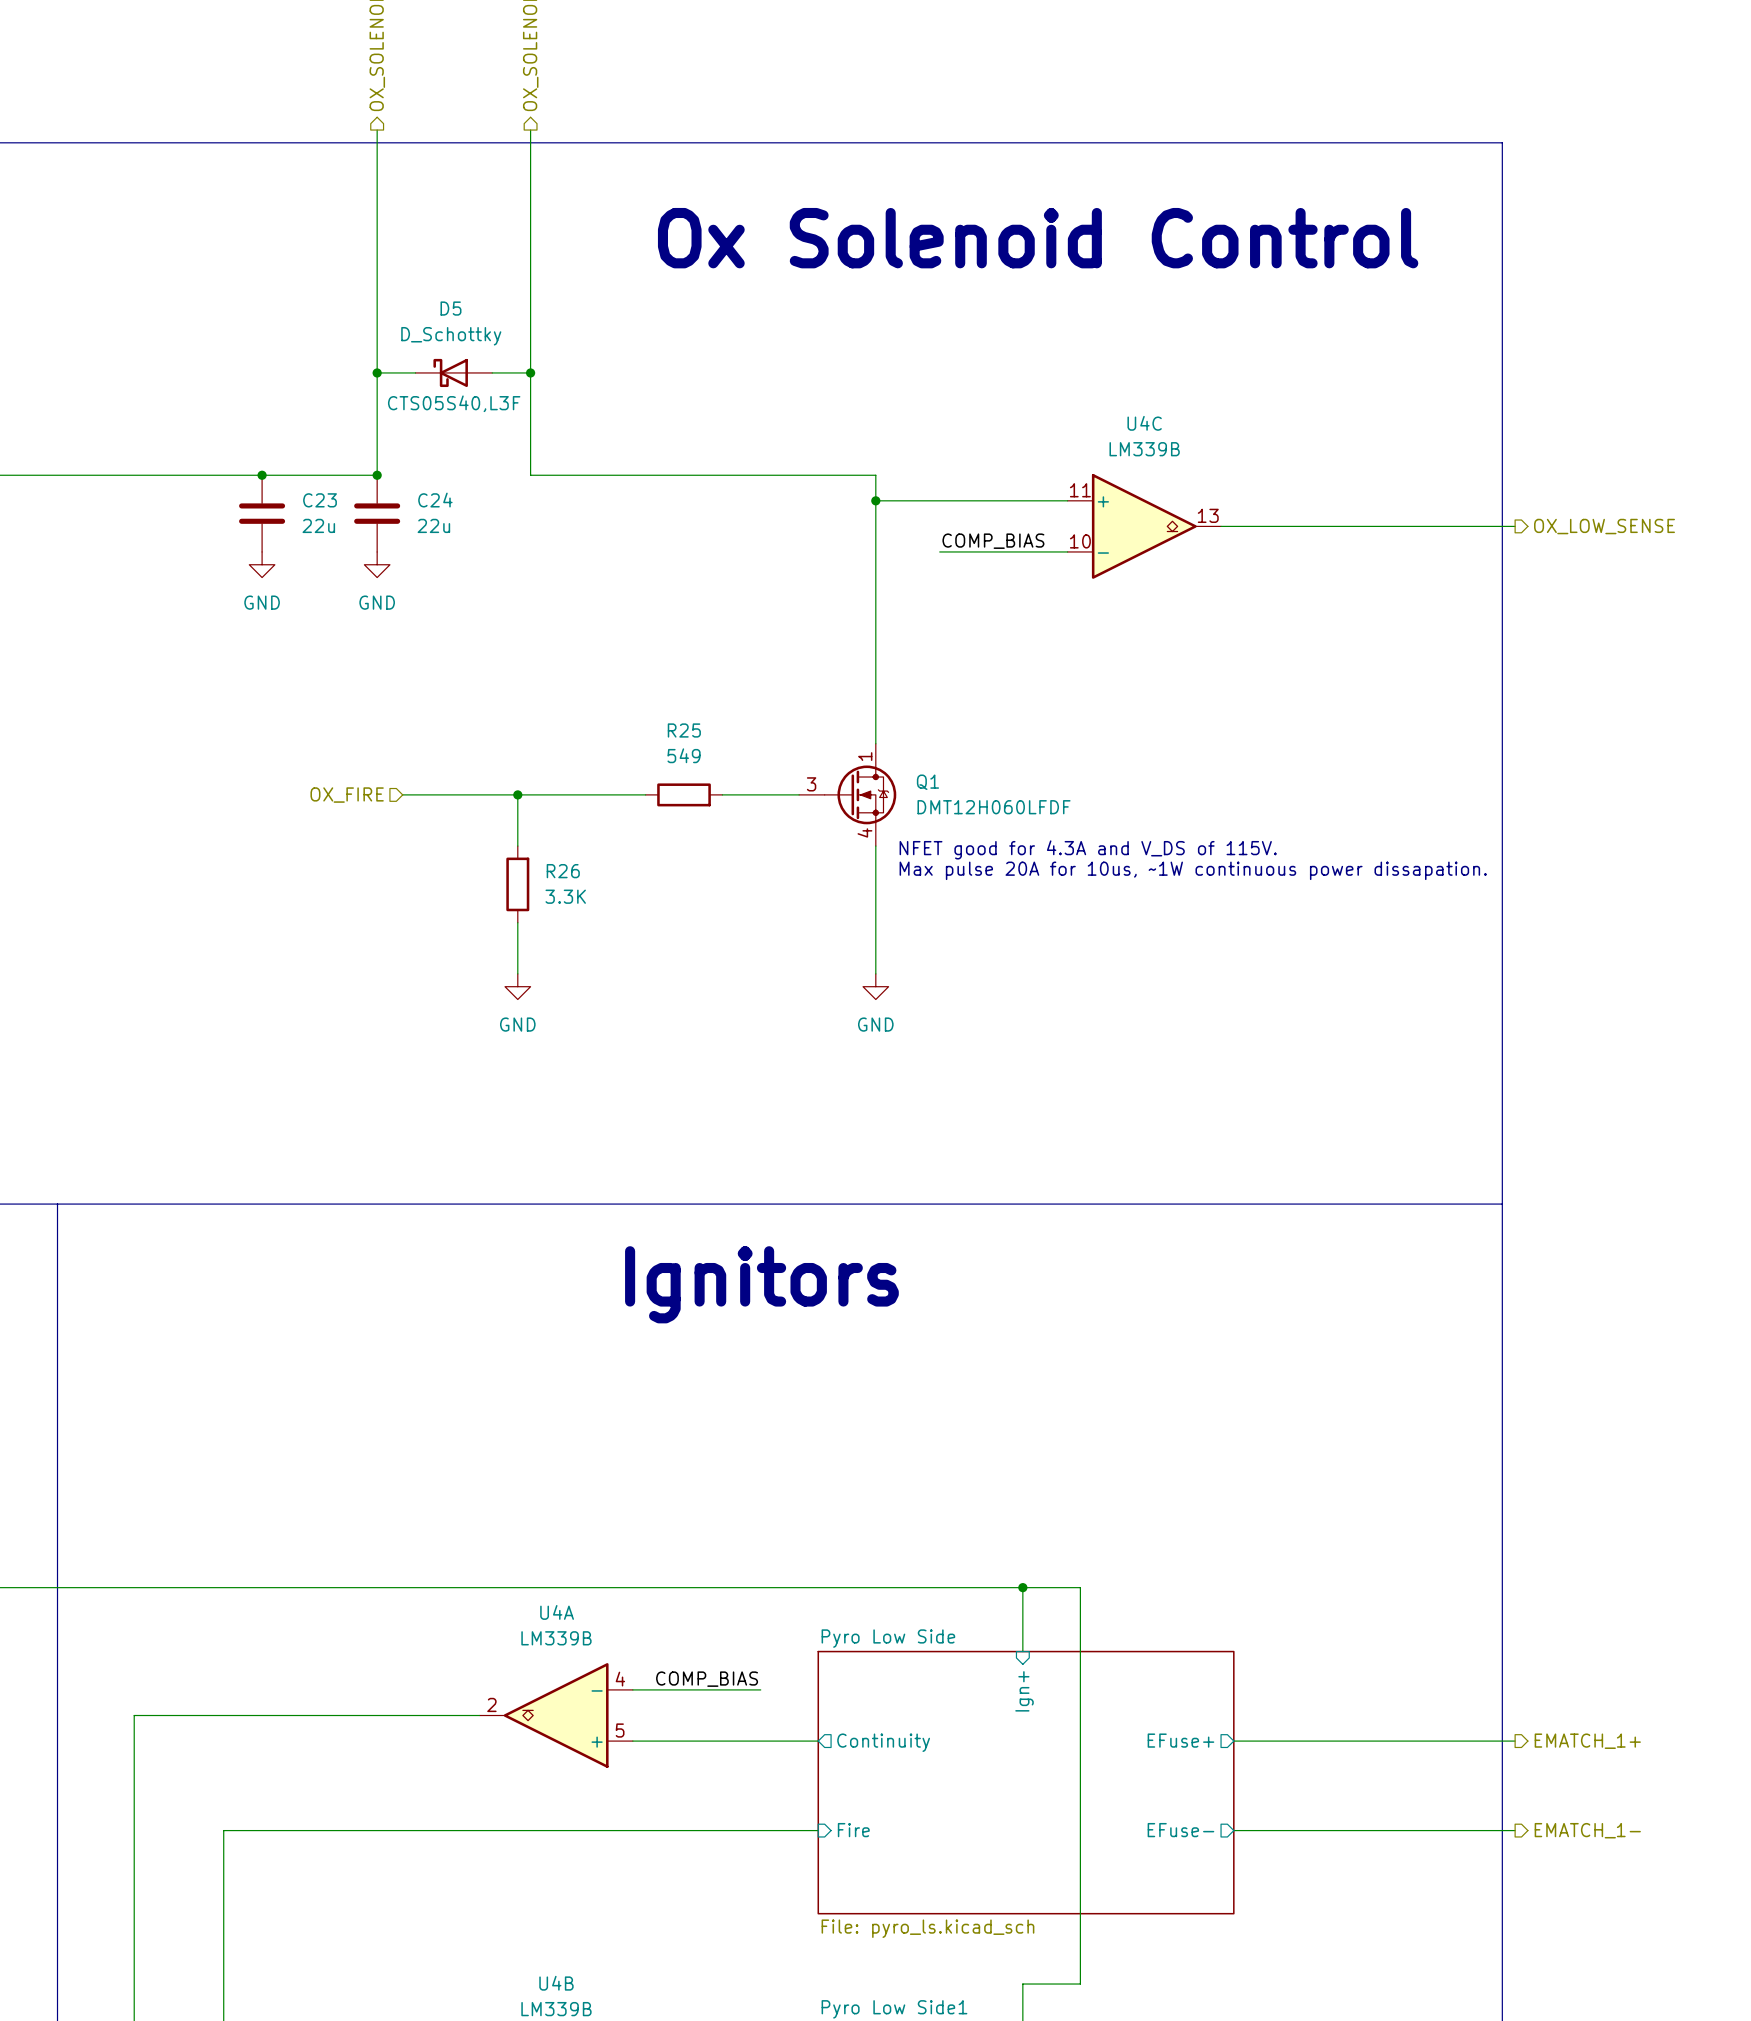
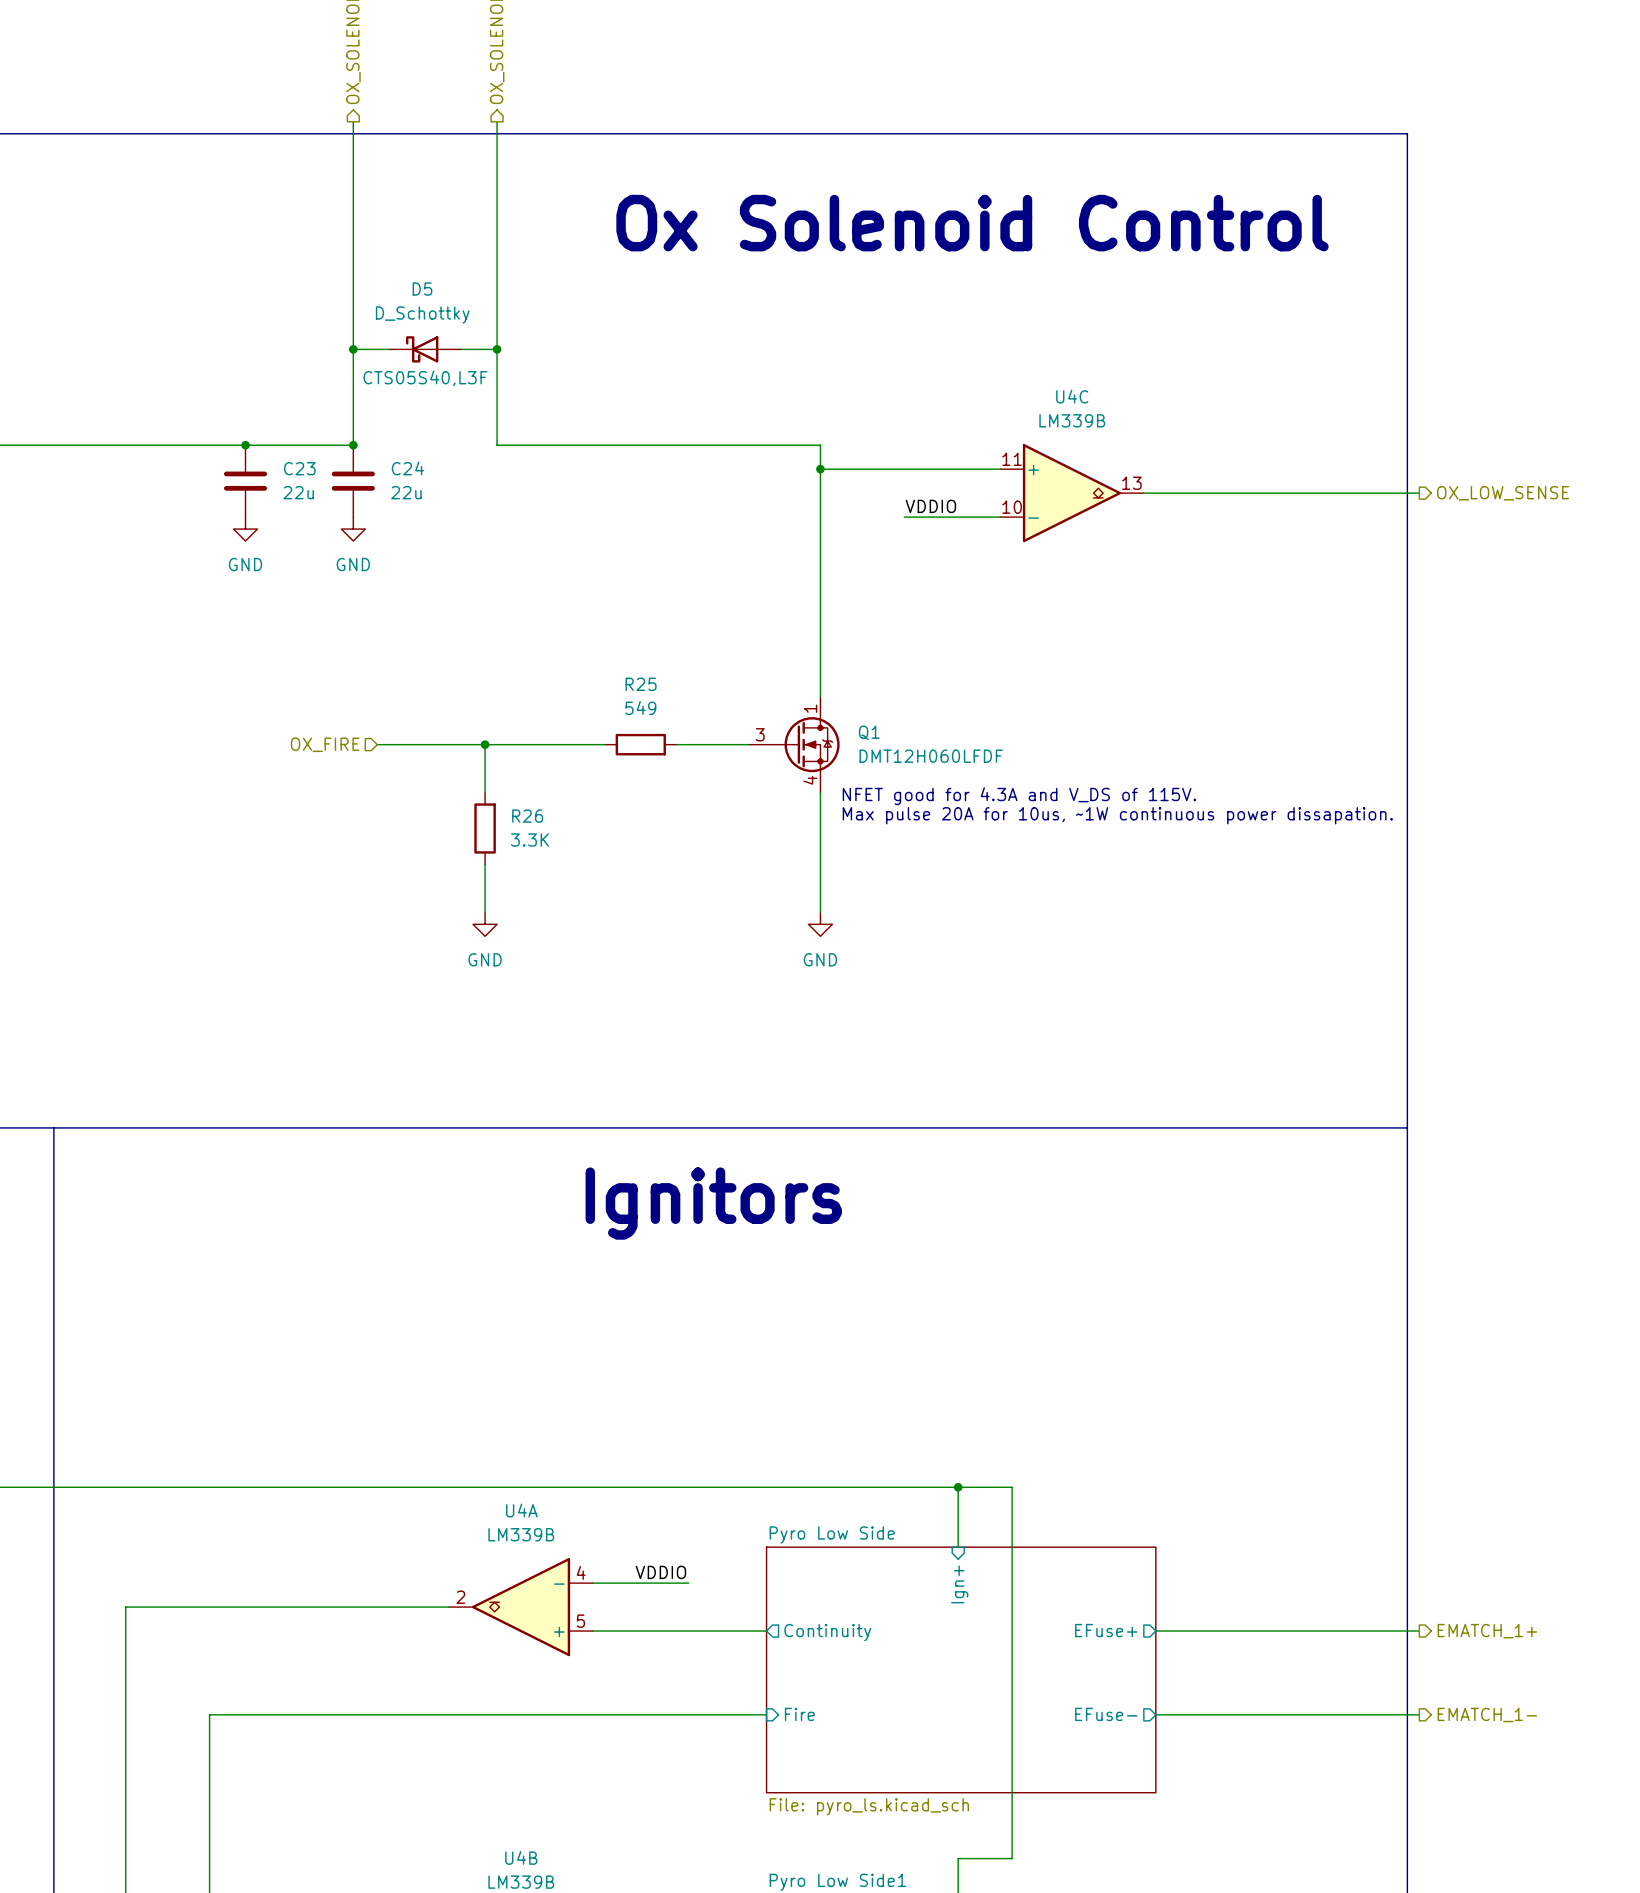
label: none -> VDDIO (930, 506)
label: COMP_BIAS (993, 541) -> none
wire: (939, 551) (965, 551) -> none
label: none -> VDDIO (660, 1572)
label: COMP_BIAS (707, 1679) -> none
wire: (735, 1689) (760, 1689) -> none

